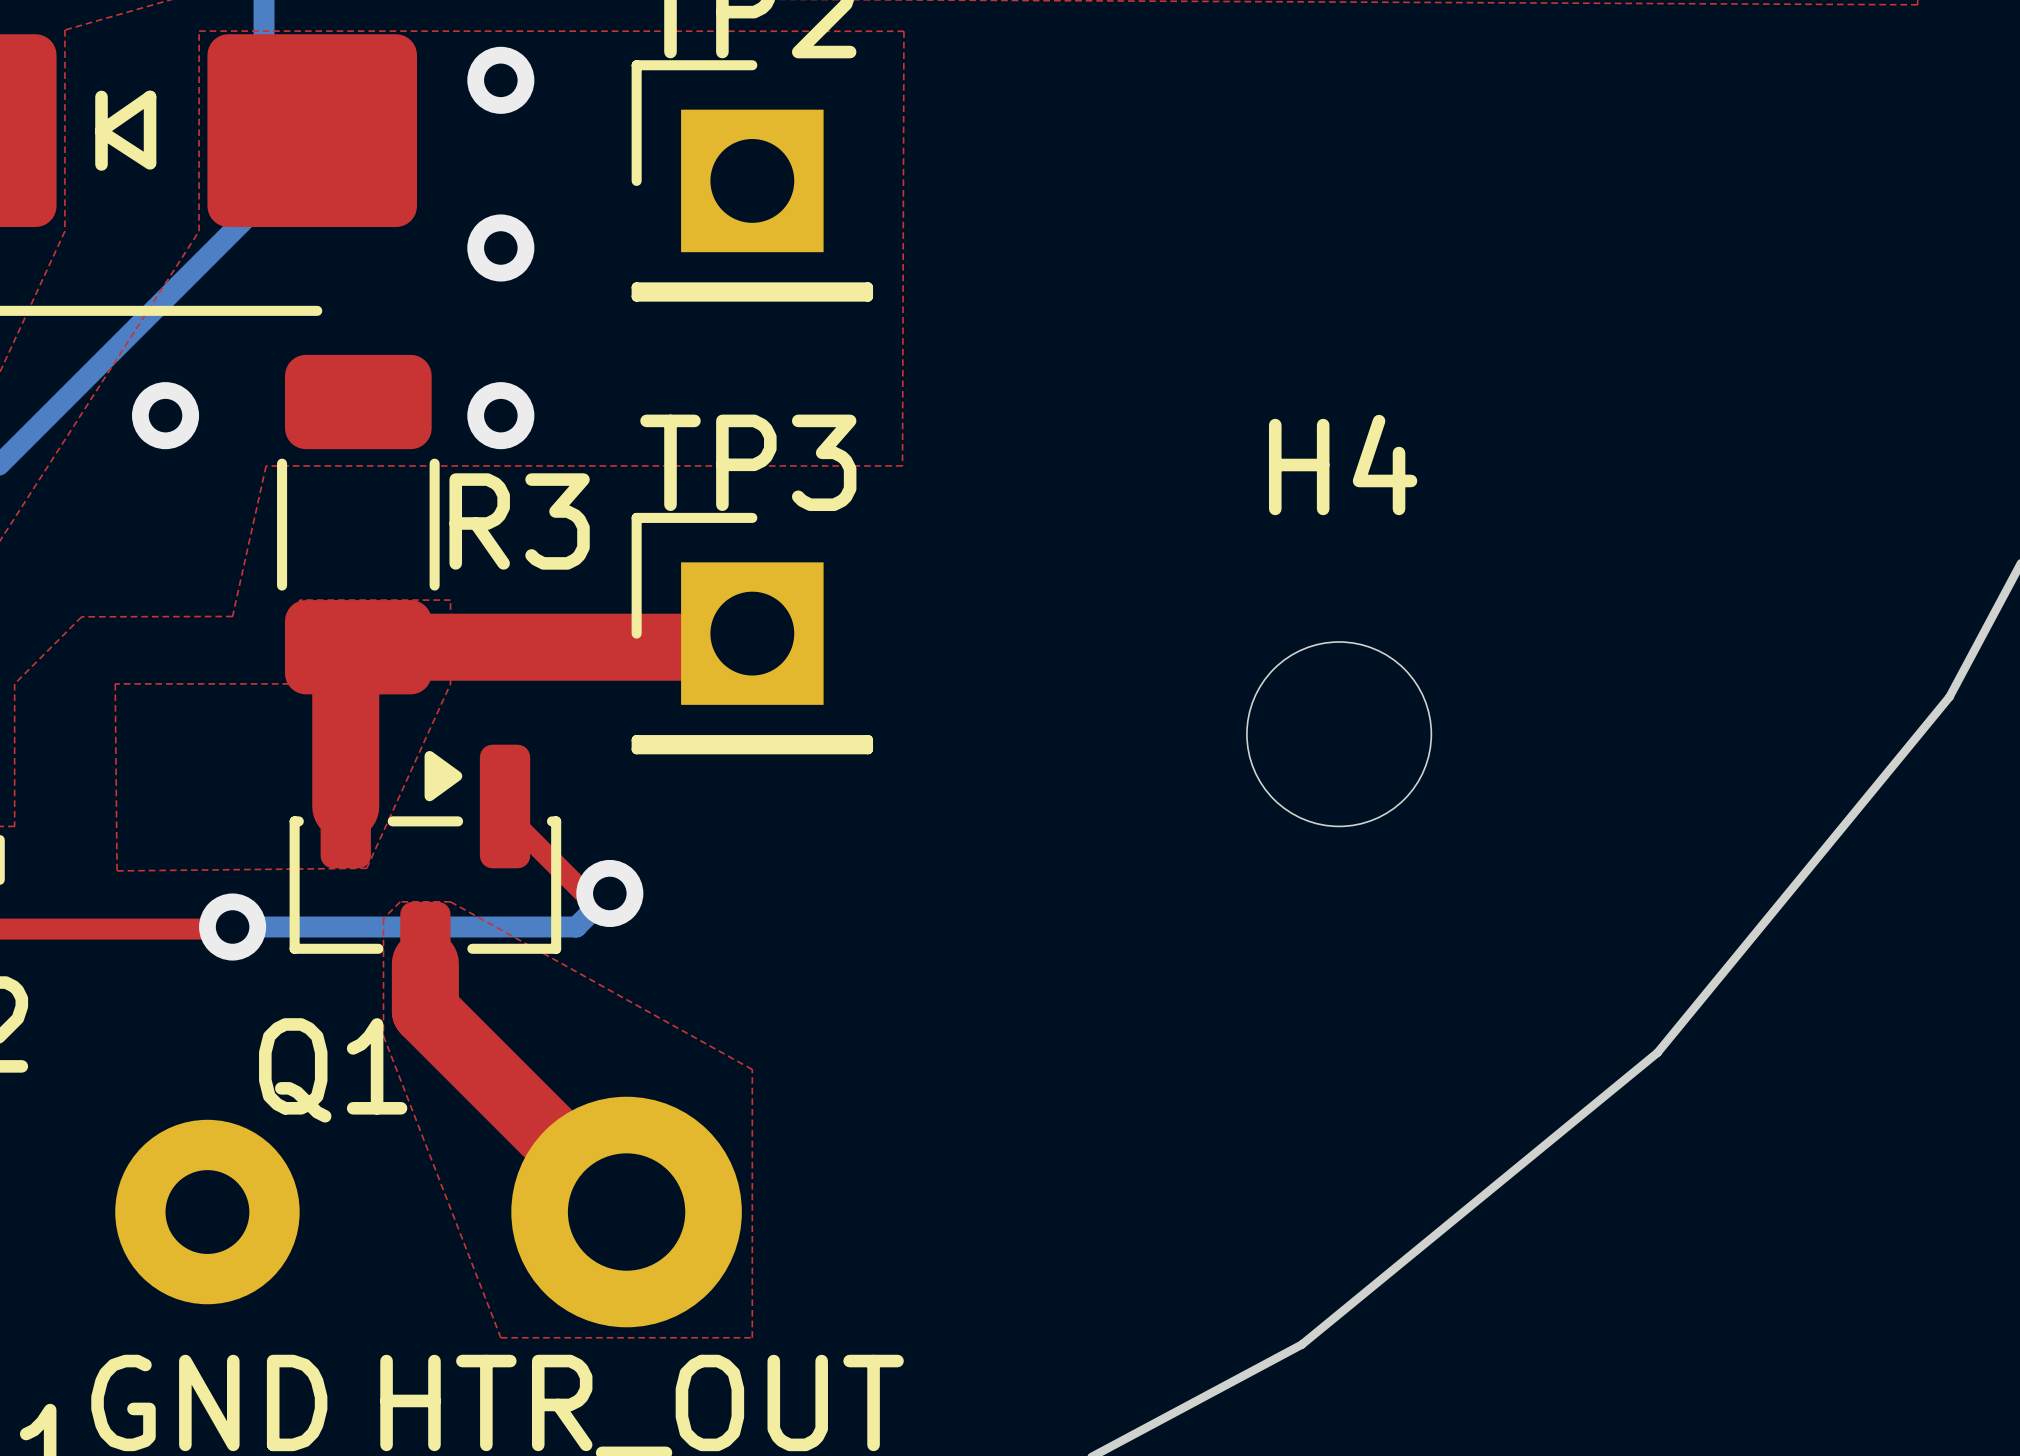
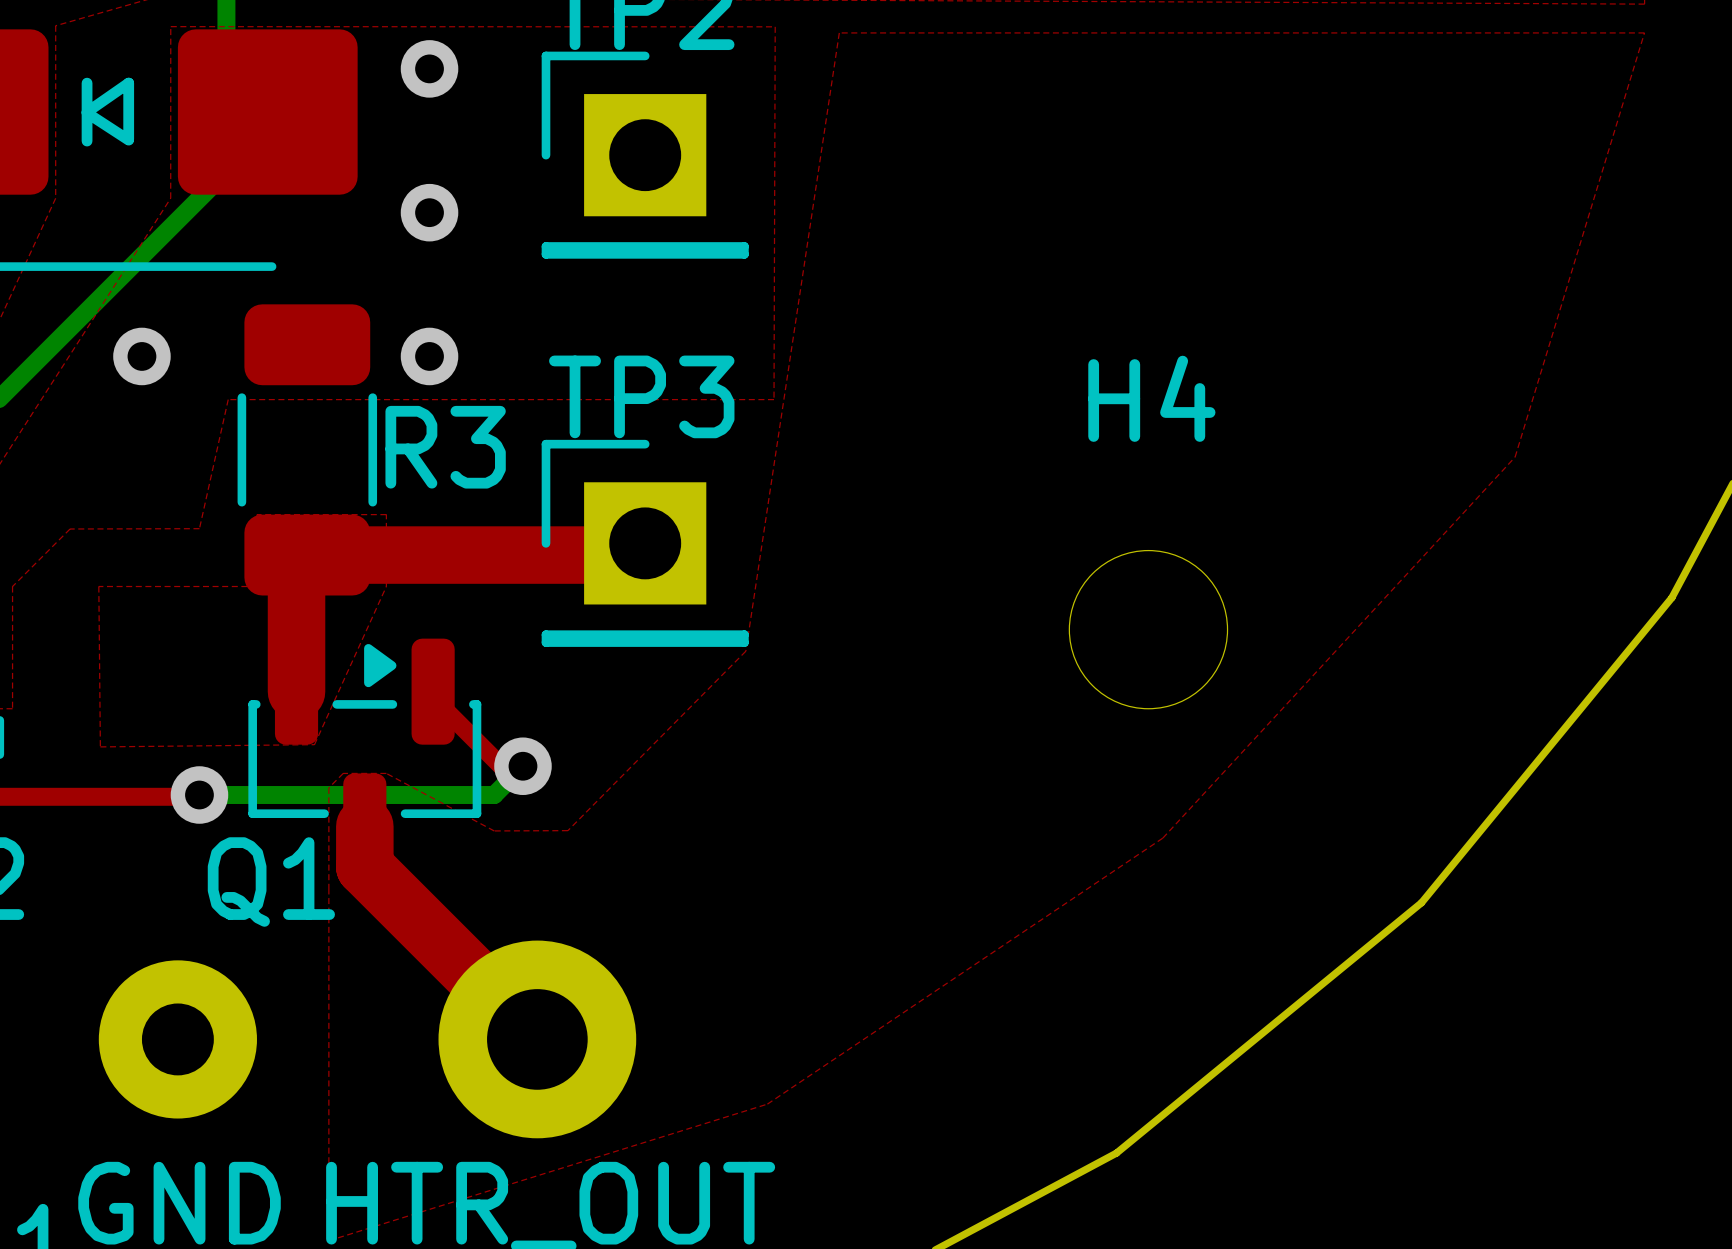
top zone outline: (450, 901) (752, 1069) (752, 1337) (500, 1337) (383, 1035) -> (386, 773) (494, 830) (567, 830) (745, 651) (839, 32) (1644, 32) (1515, 457) (1162, 838) (767, 1104) (328, 1240) (328, 888)
Q1 name position: Q1 (333, 1070) -> Q1 (271, 882)

